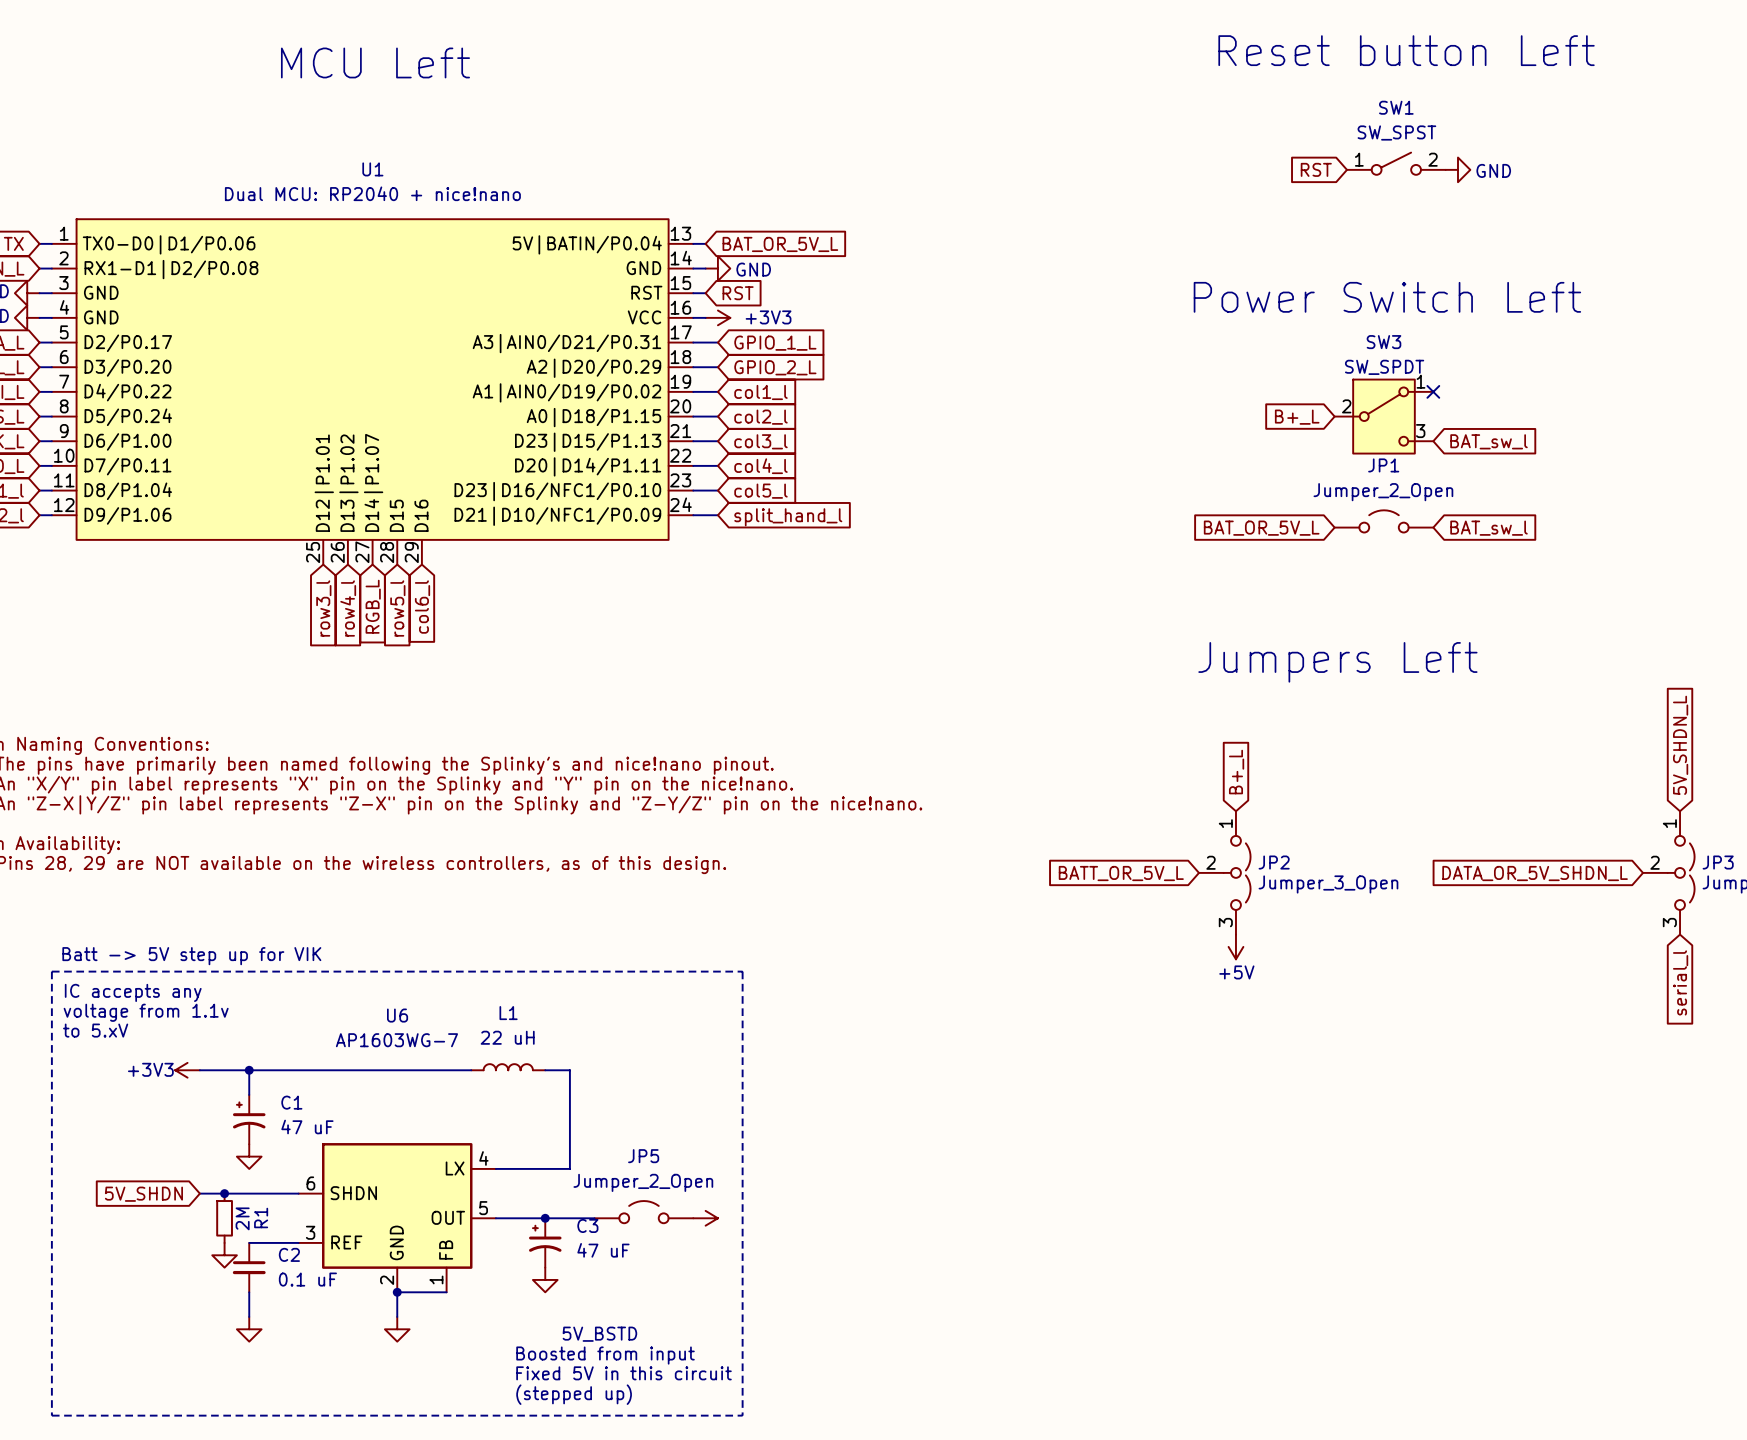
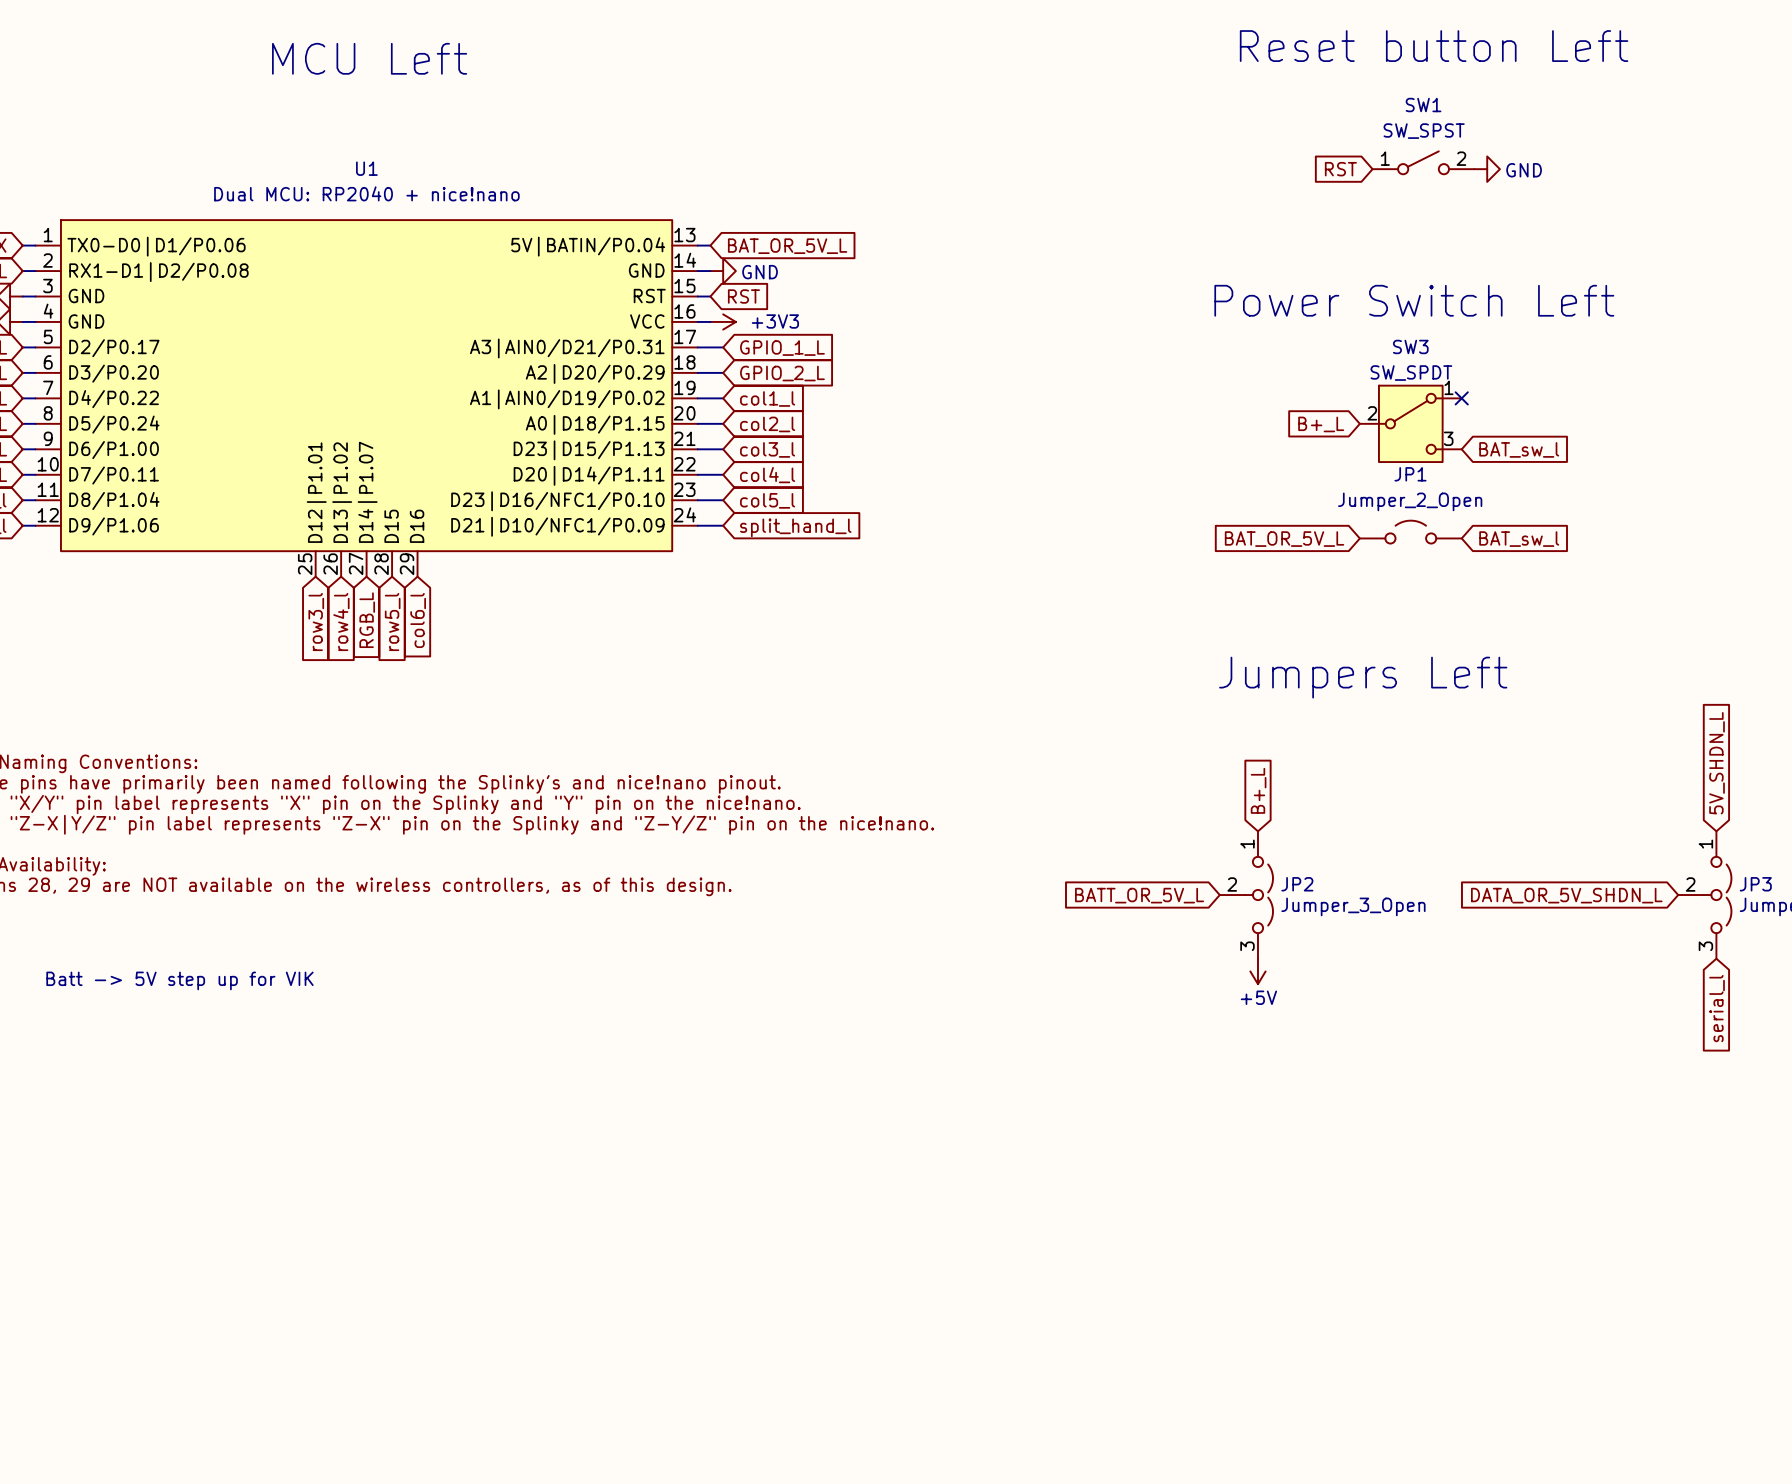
line: (51, 971) (742, 971) (742, 1415) (51, 1415) (51, 971) -> none
text: IC accepts any (133, 992) -> none
text: voltage from 1.1v (146, 1012) -> none
text: to 5.xV (95, 1030) -> none
L1: 22 uH (508, 1067) -> none
power symbol: +3V3 (187, 1070) -> none
wire: (199, 1070) (471, 1070) -> none
wire: (249, 1070) (249, 1094) -> none
junction: (249, 1070) -> none
wire: (545, 1070) (569, 1070) (569, 1168) (495, 1168) -> none
C1: 47 uF (249, 1119) -> none
power symbol: (249, 1156) -> none
wire: (199, 1193) (298, 1193) -> none
junction: (224, 1193) -> none
global label: 5V_SHDN (143, 1194) -> none
JP5: Jumper_2_Open (643, 1212) -> none
U6: AP1603WG-7 (397, 1217) -> none
R1: 2M (224, 1218) -> none
wire: (495, 1218) (594, 1218) -> none
junction: (545, 1218) -> none
power symbol: (705, 1218) -> none
wire: (249, 1242) (298, 1242) -> none
C3: 47 uF (545, 1242) -> none
power symbol: (224, 1255) -> none
C2: 0.1 uF (249, 1267) -> none
power symbol: (545, 1279) -> none
wire: (249, 1292) (249, 1316) -> none
junction: (397, 1292) -> none
wire: (446, 1292) (397, 1292) (397, 1316) -> none
power symbol: (249, 1329) -> none
power symbol: (397, 1329) -> none
text: 5V_BSTD (599, 1334) -> none
text: Boosted from input (605, 1355) -> none
text: Fixed 5V in this circuit (624, 1373) -> none
text: (stepped up) (574, 1394) -> none

